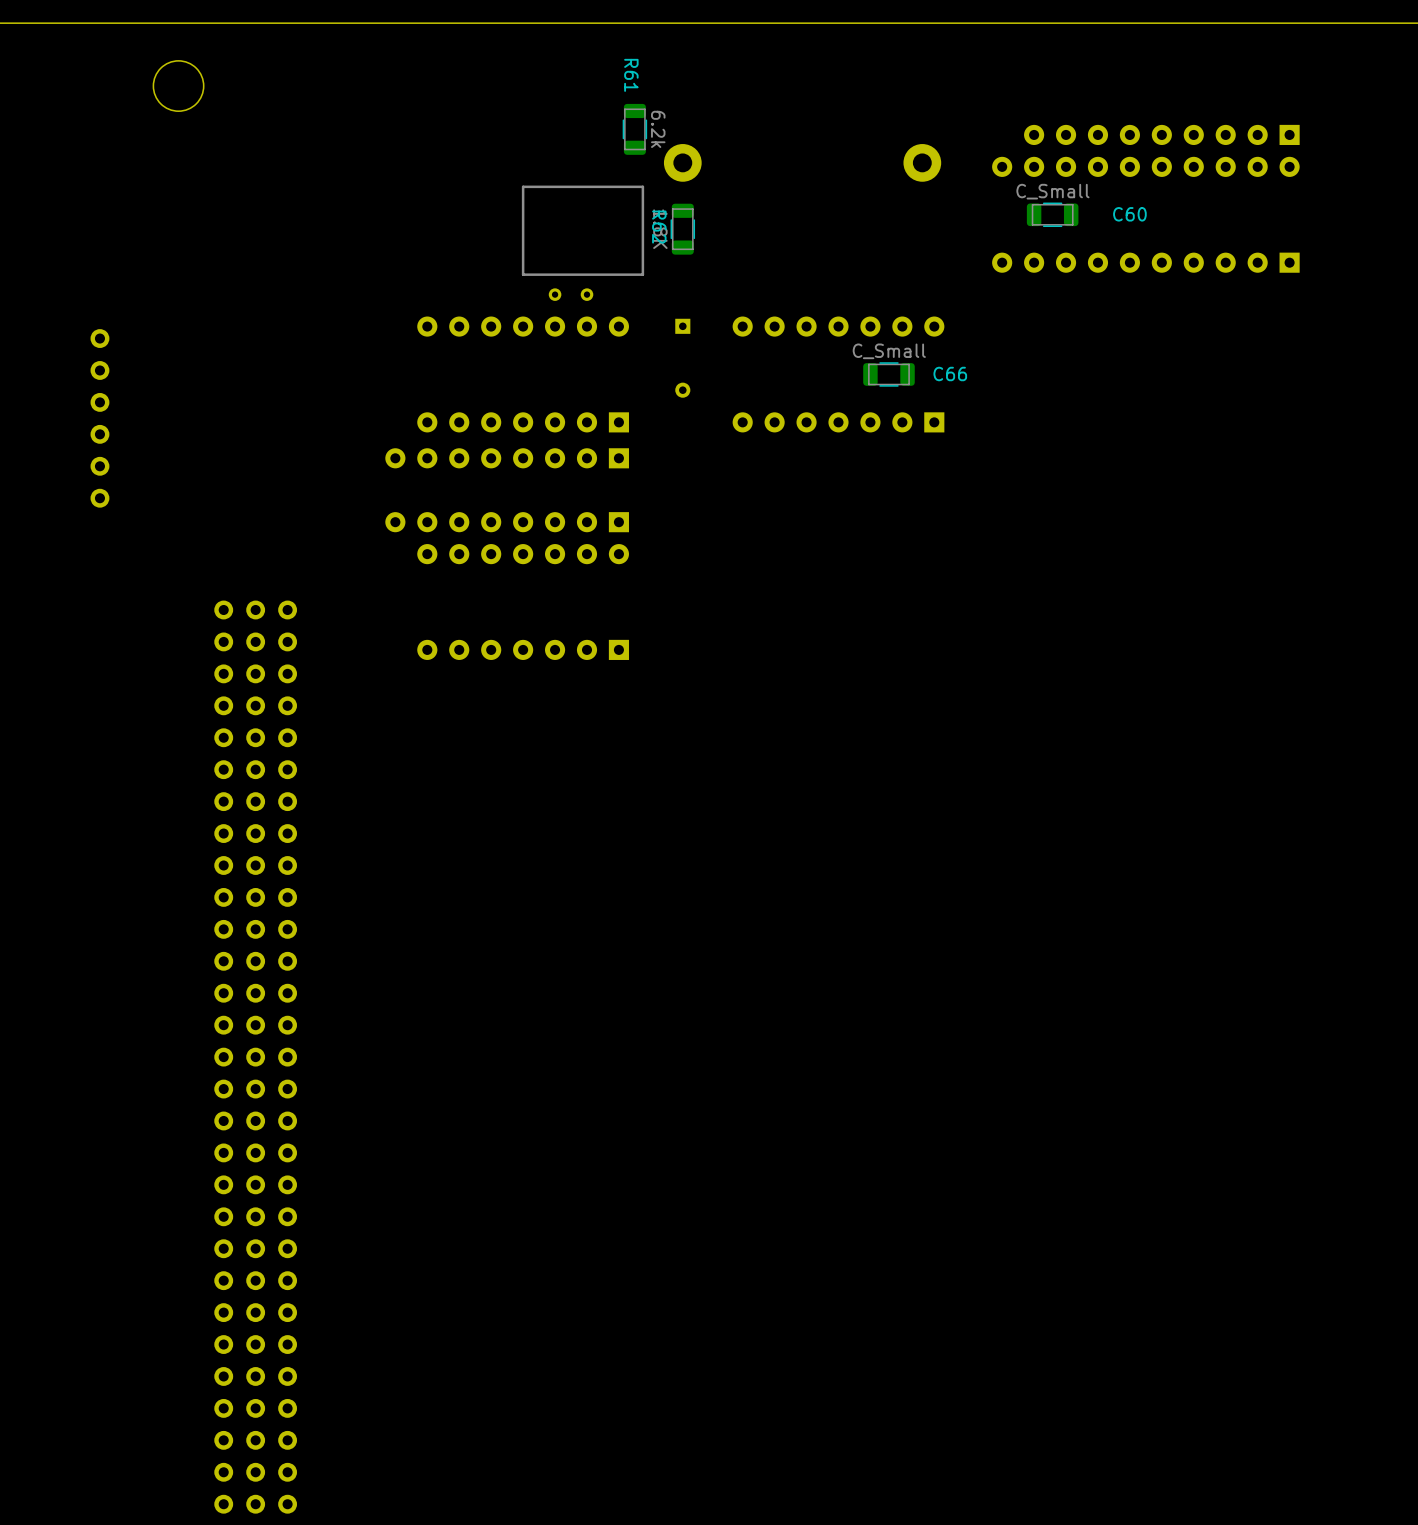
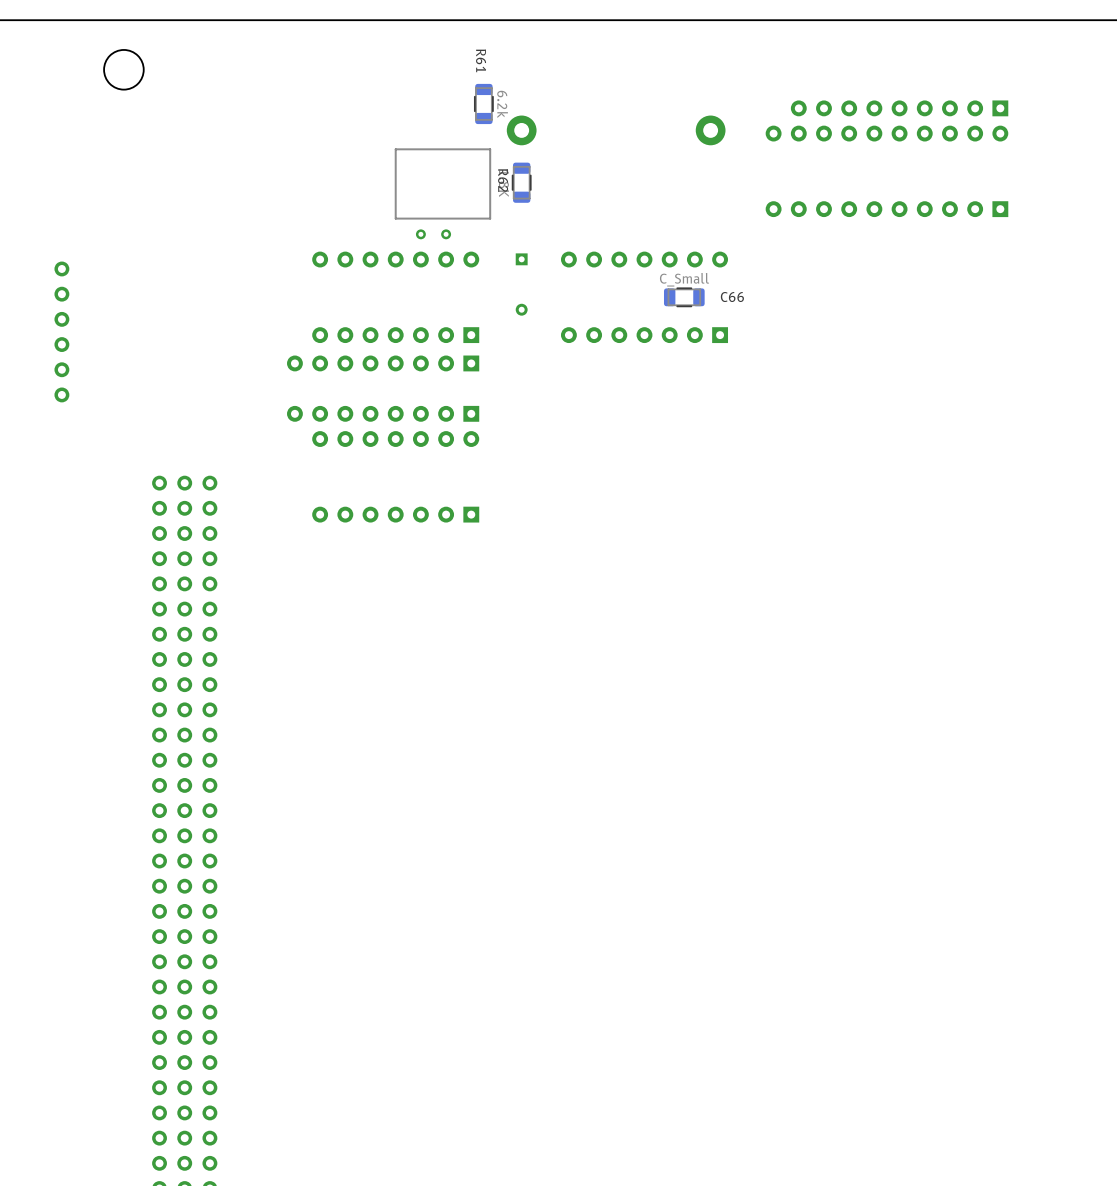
C60: C_Small (1052, 214) -> none

